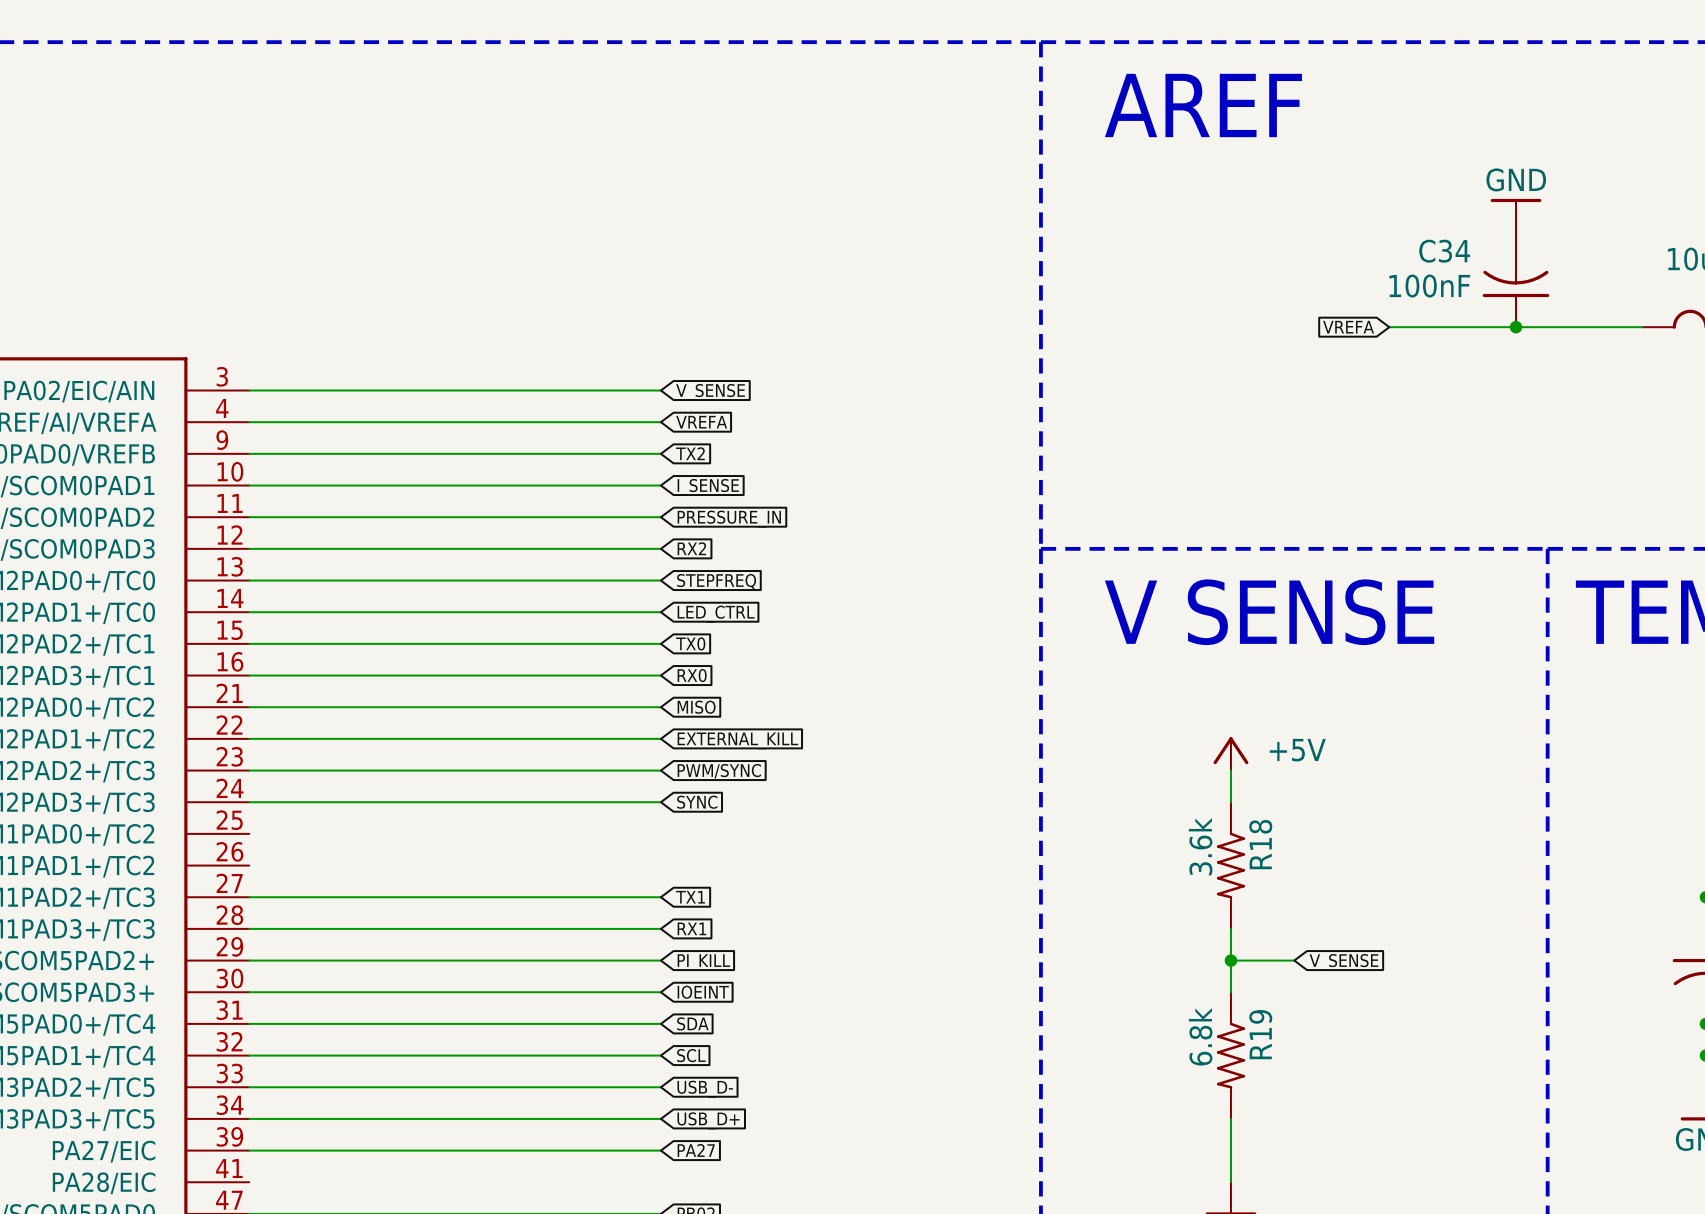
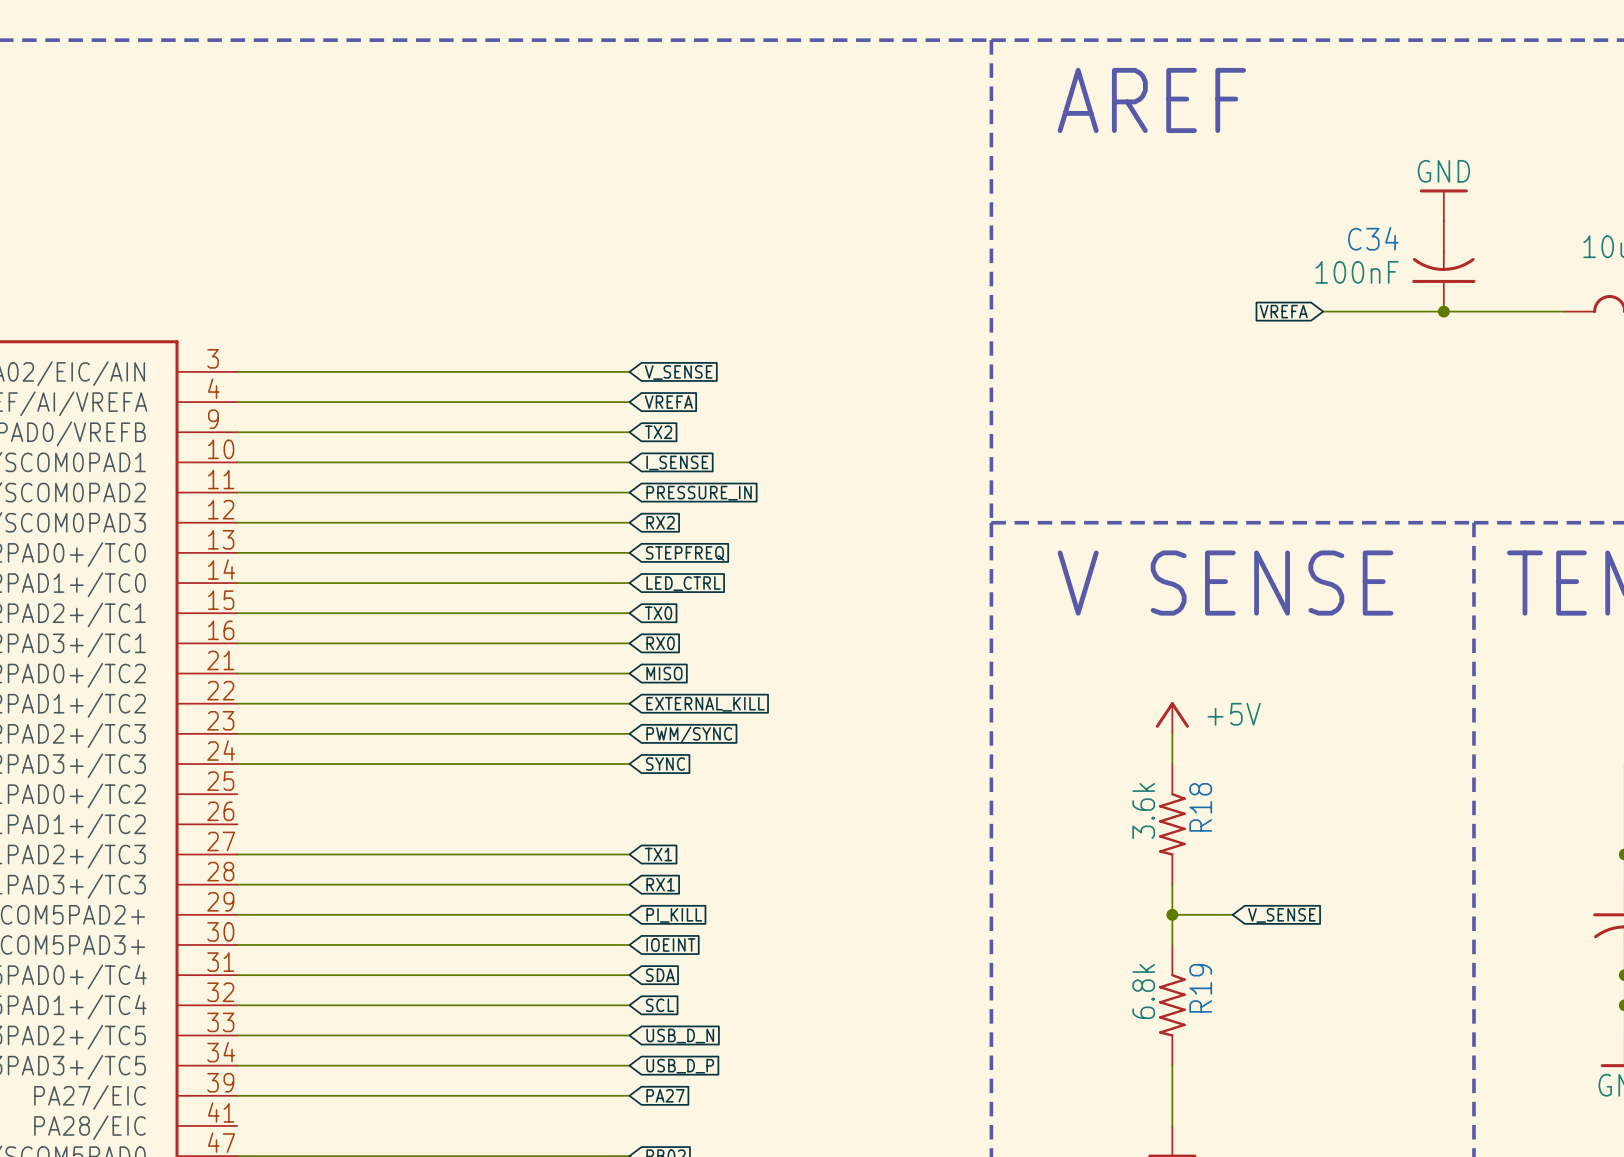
global label: USB_D- (705, 1089) -> USB_D_N (680, 1036)
global label: USB_D+ (708, 1120) -> USB_D_P (680, 1066)

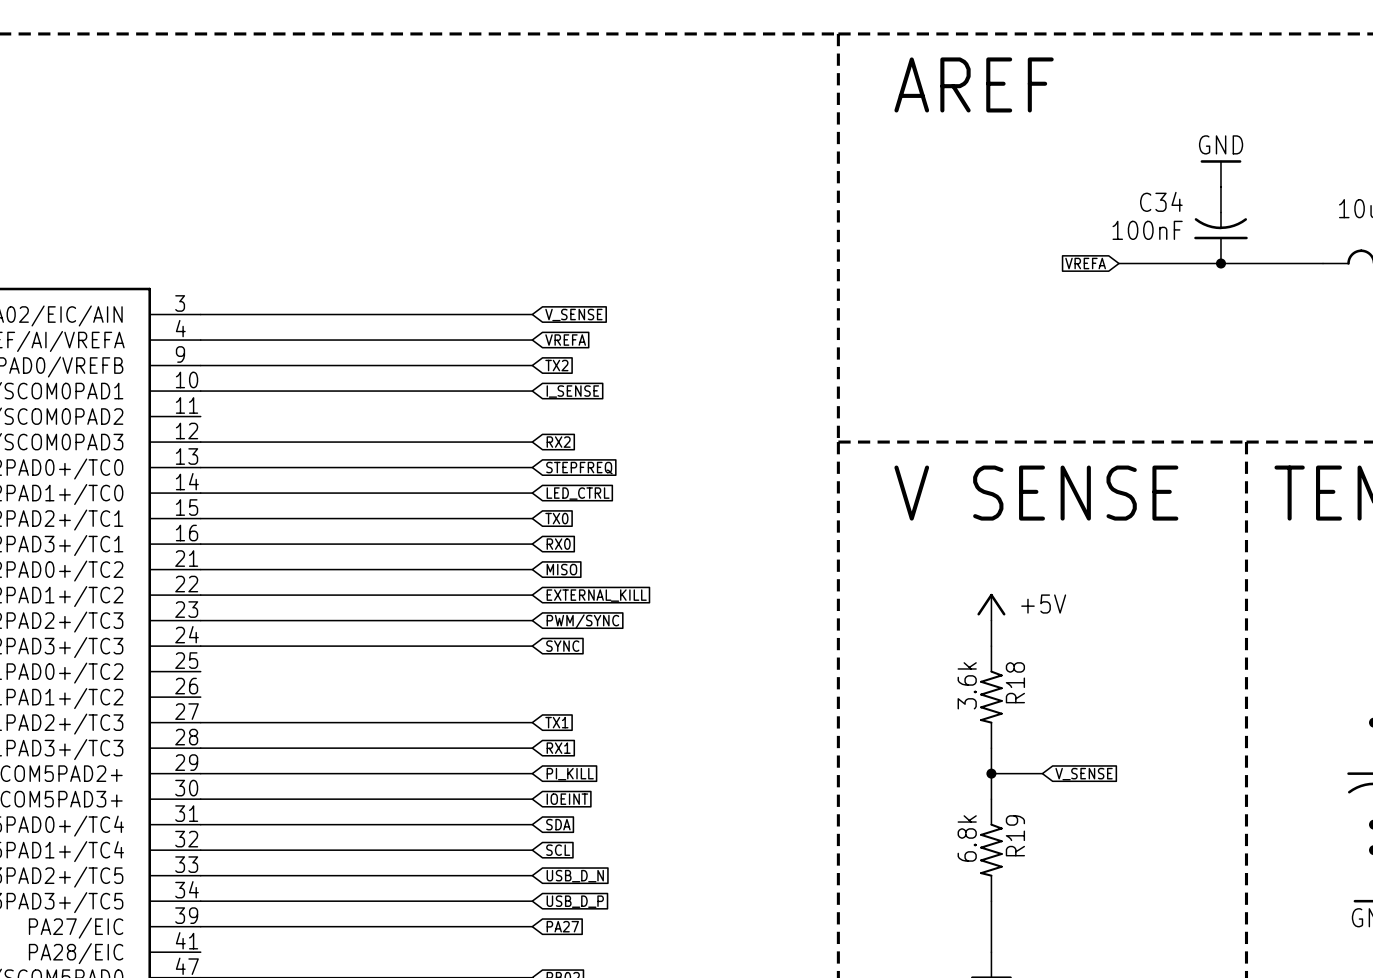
wire: (237, 492) (629, 492) -> none
global label: PRESSURE_IN (699, 493) -> none

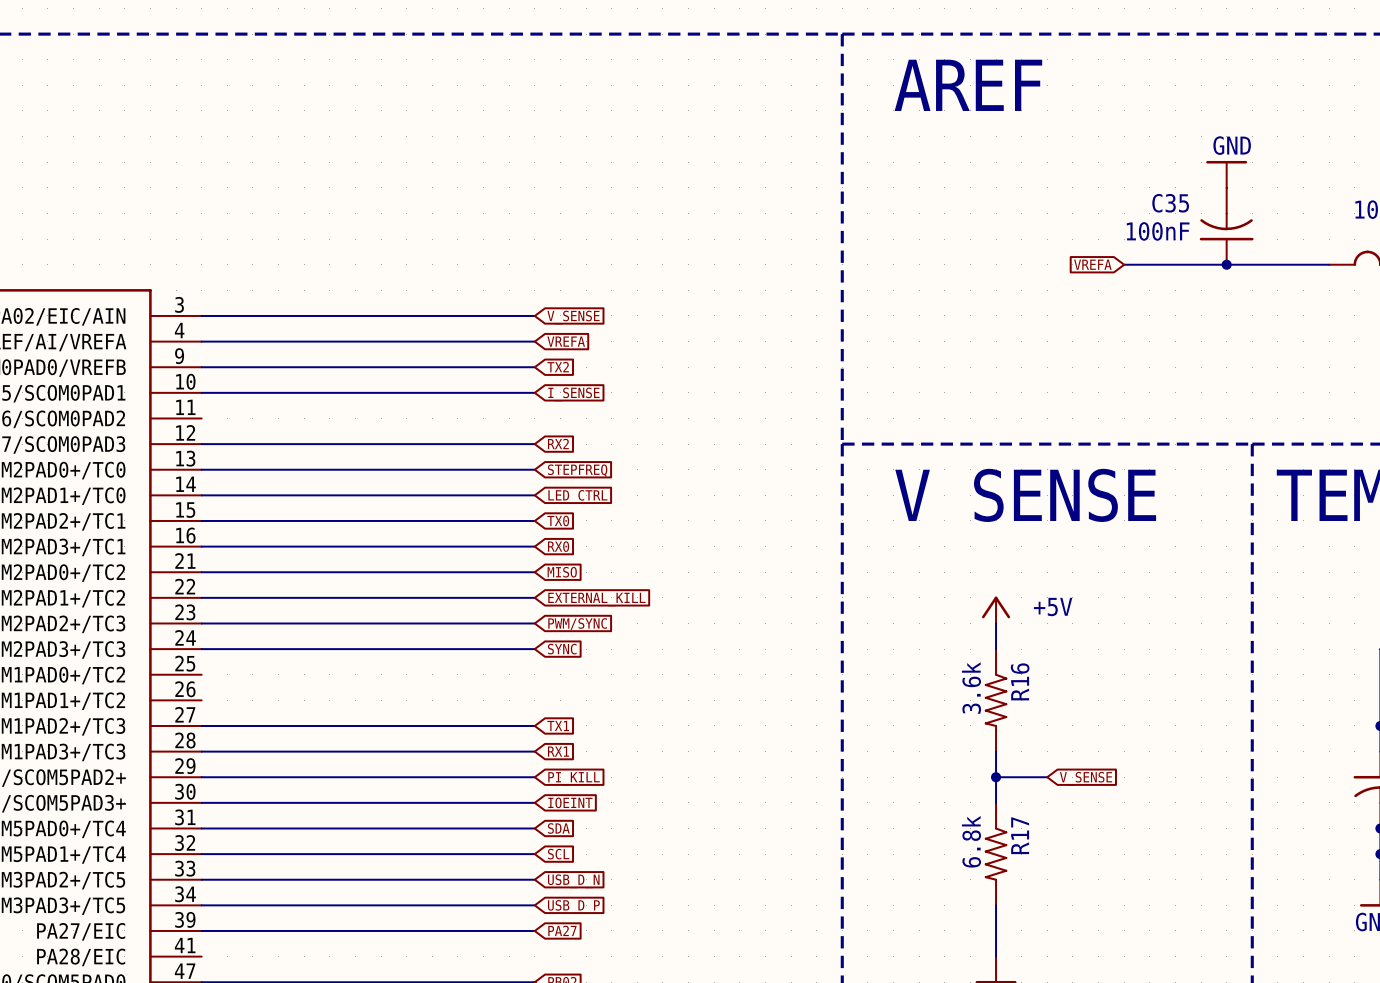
C34 name: C34 (1161, 201) -> C35 (1170, 203)
R18 name: R18 (1015, 682) -> R16 (1020, 681)
R19 name: R19 (1015, 835) -> R17 (1020, 835)

